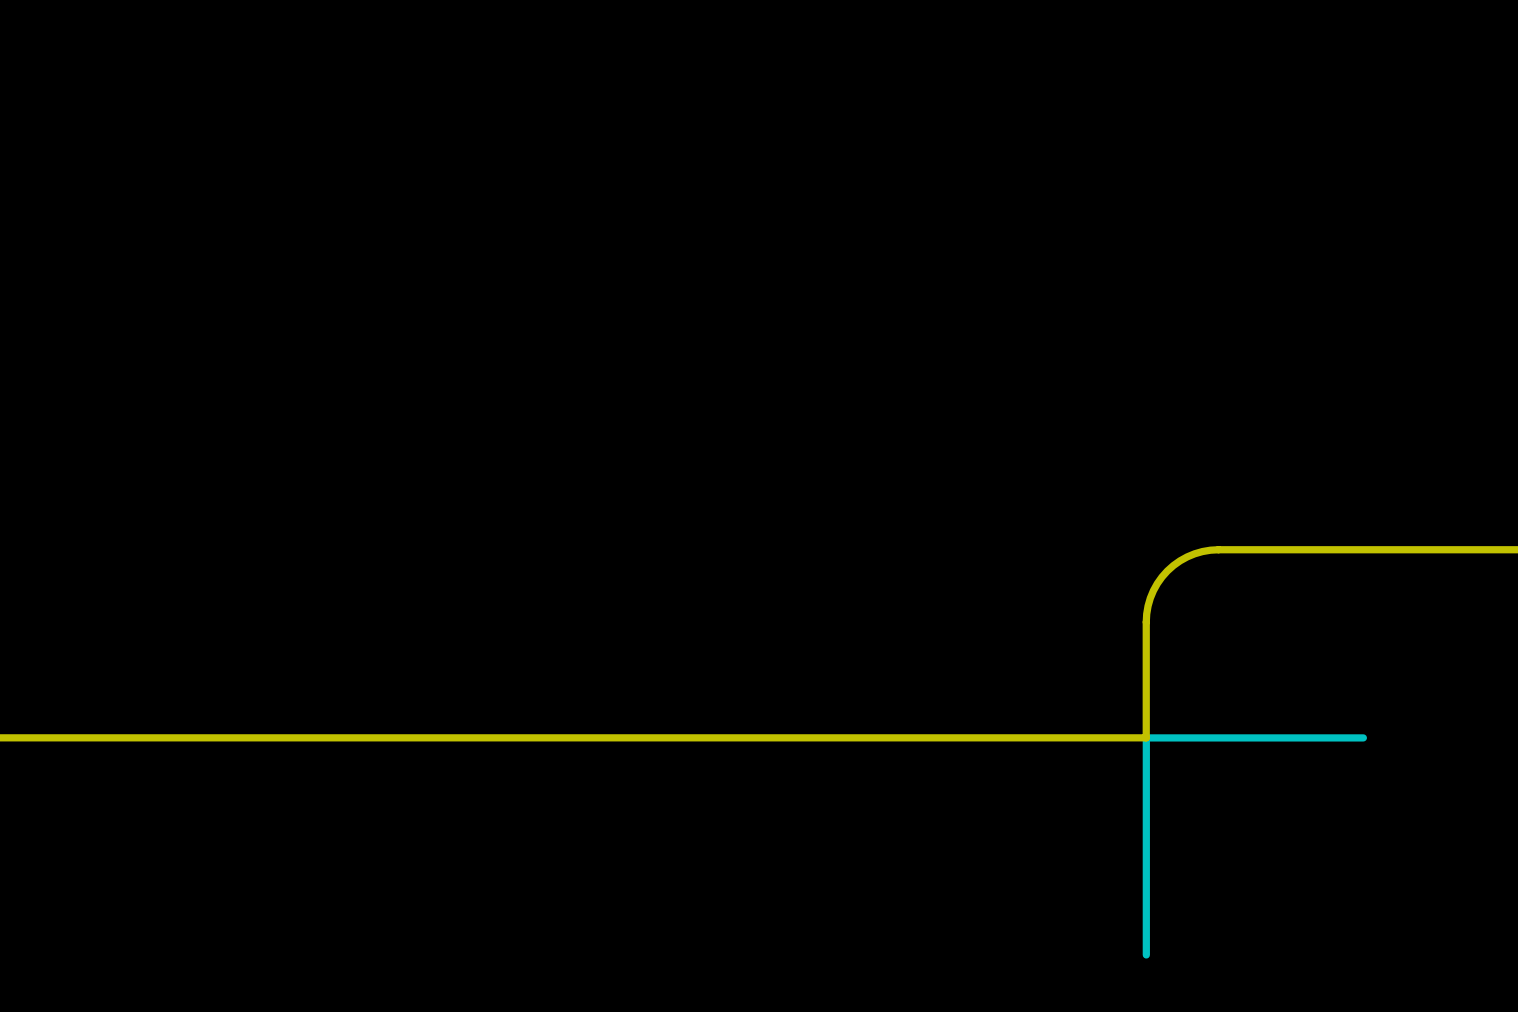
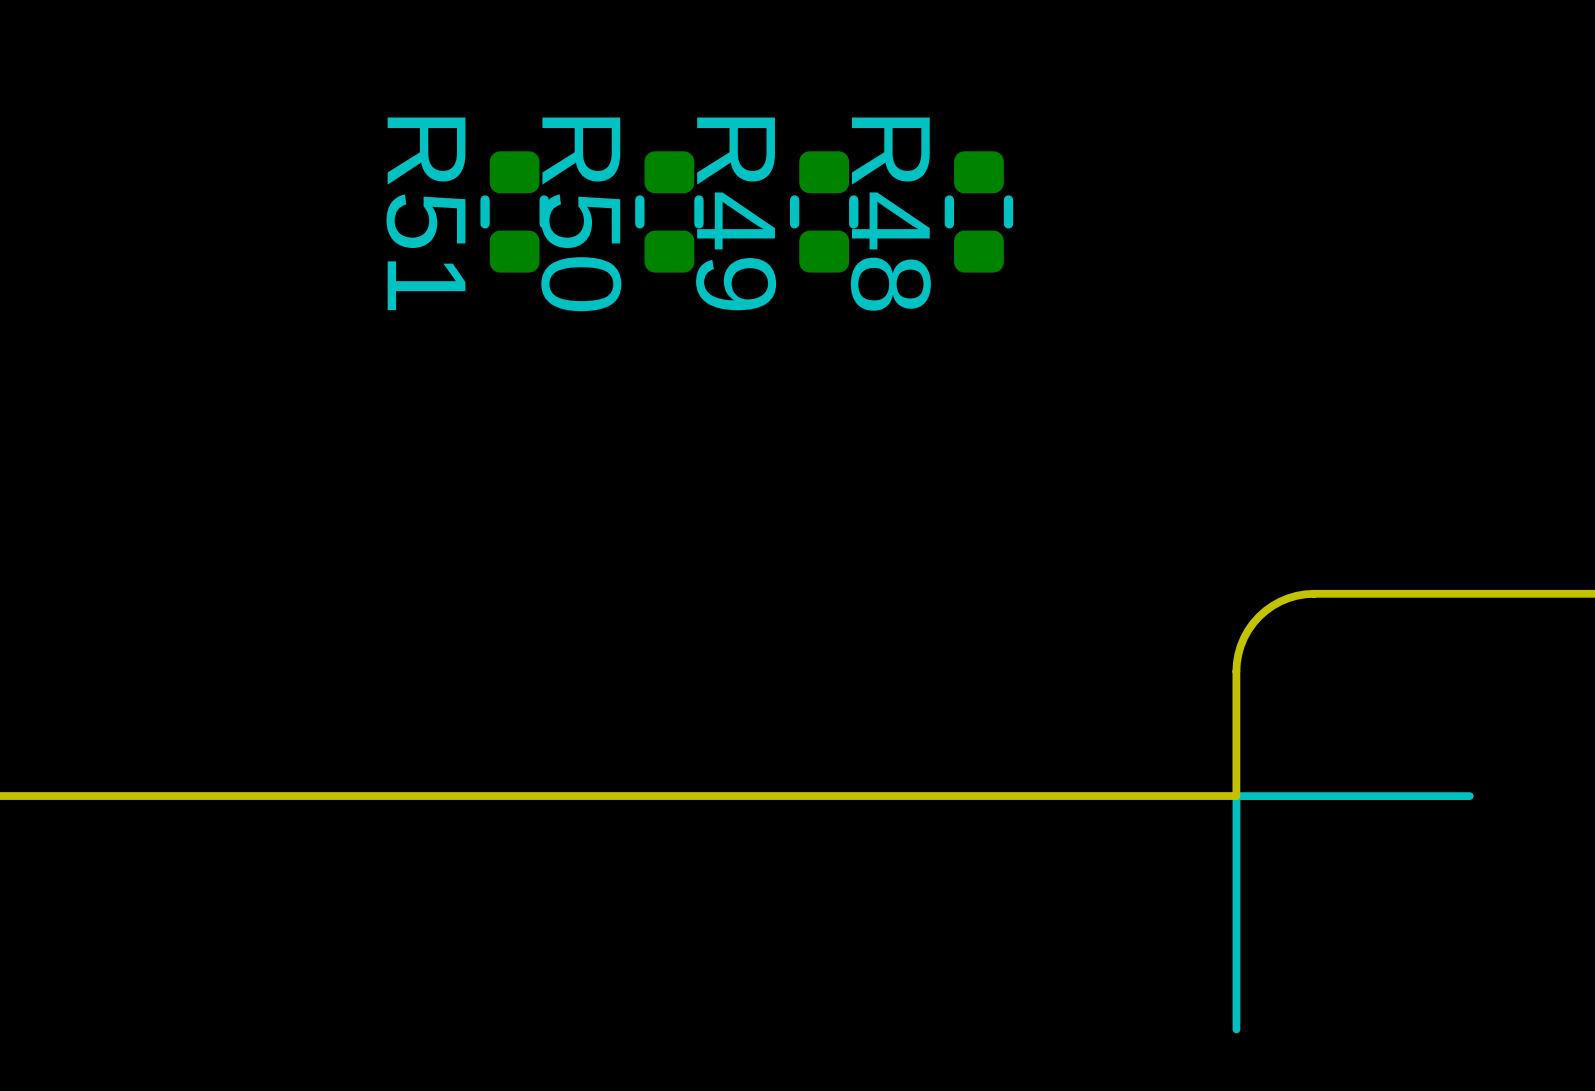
R51: none -> (514, 211)
R50: none -> (669, 211)
R49: none -> (824, 211)
R48: none -> (978, 211)

